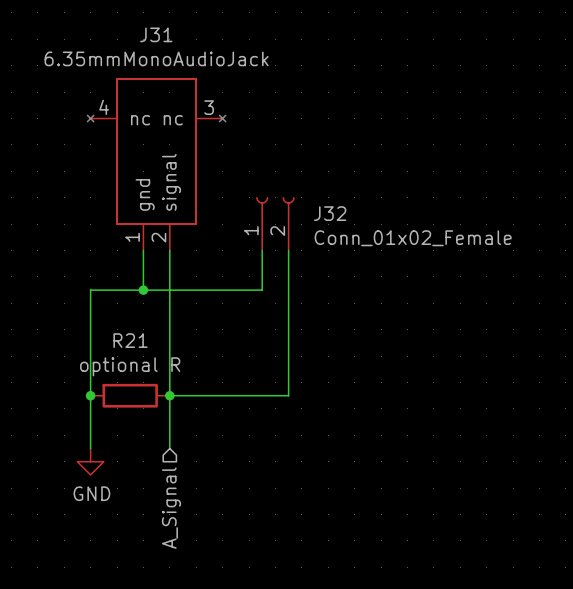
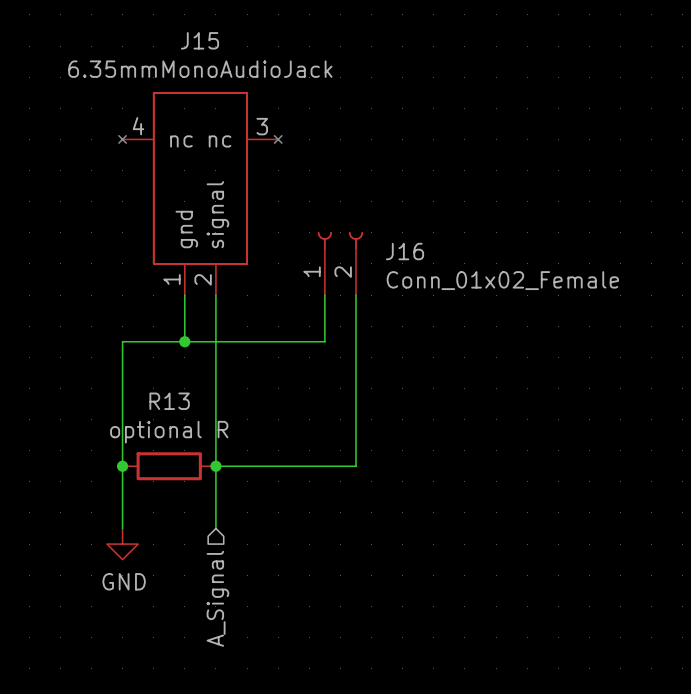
J31 name: J31 (156, 34) -> J15 (200, 40)
J32 name: J32 (330, 213) -> J16 (405, 251)
R21 name: R21 (130, 340) -> R13 (169, 401)

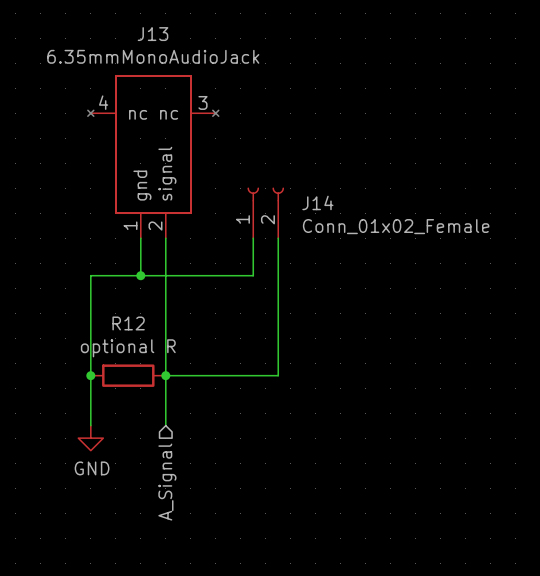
J15 name: J15 (200, 40) -> J13 (152, 34)
J16 name: J16 (405, 251) -> J14 (317, 202)
R13 name: R13 (169, 401) -> R12 (128, 323)

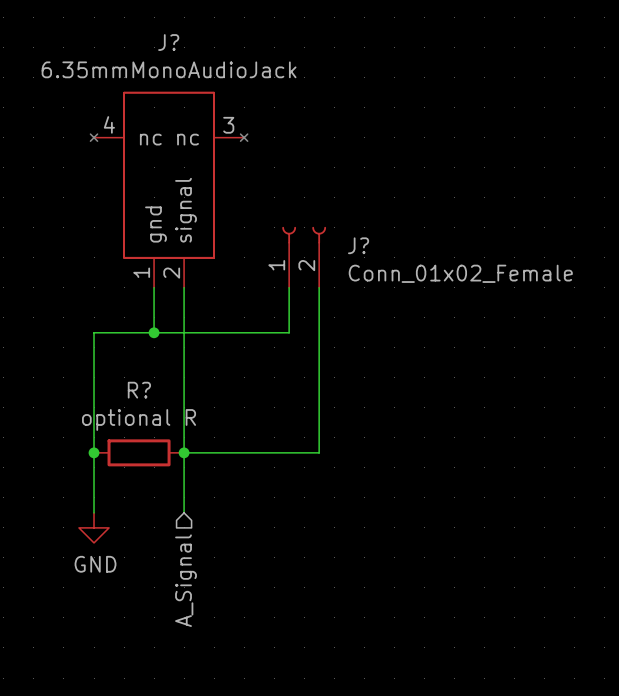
J13 name: J13 (152, 34) -> J? (168, 42)
J14 name: J14 (317, 202) -> J? (358, 245)
R12 name: R12 (128, 323) -> R? (139, 390)

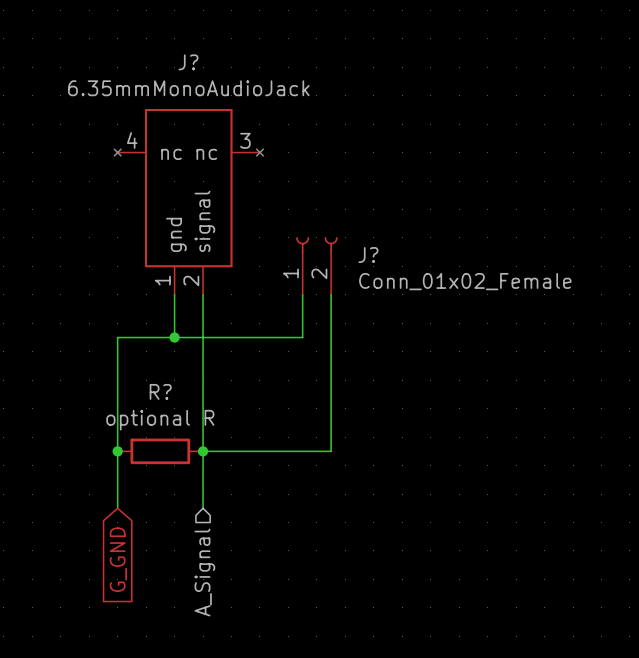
power symbol: GND (94, 527) -> none
global label: none -> G_GND (118, 559)

